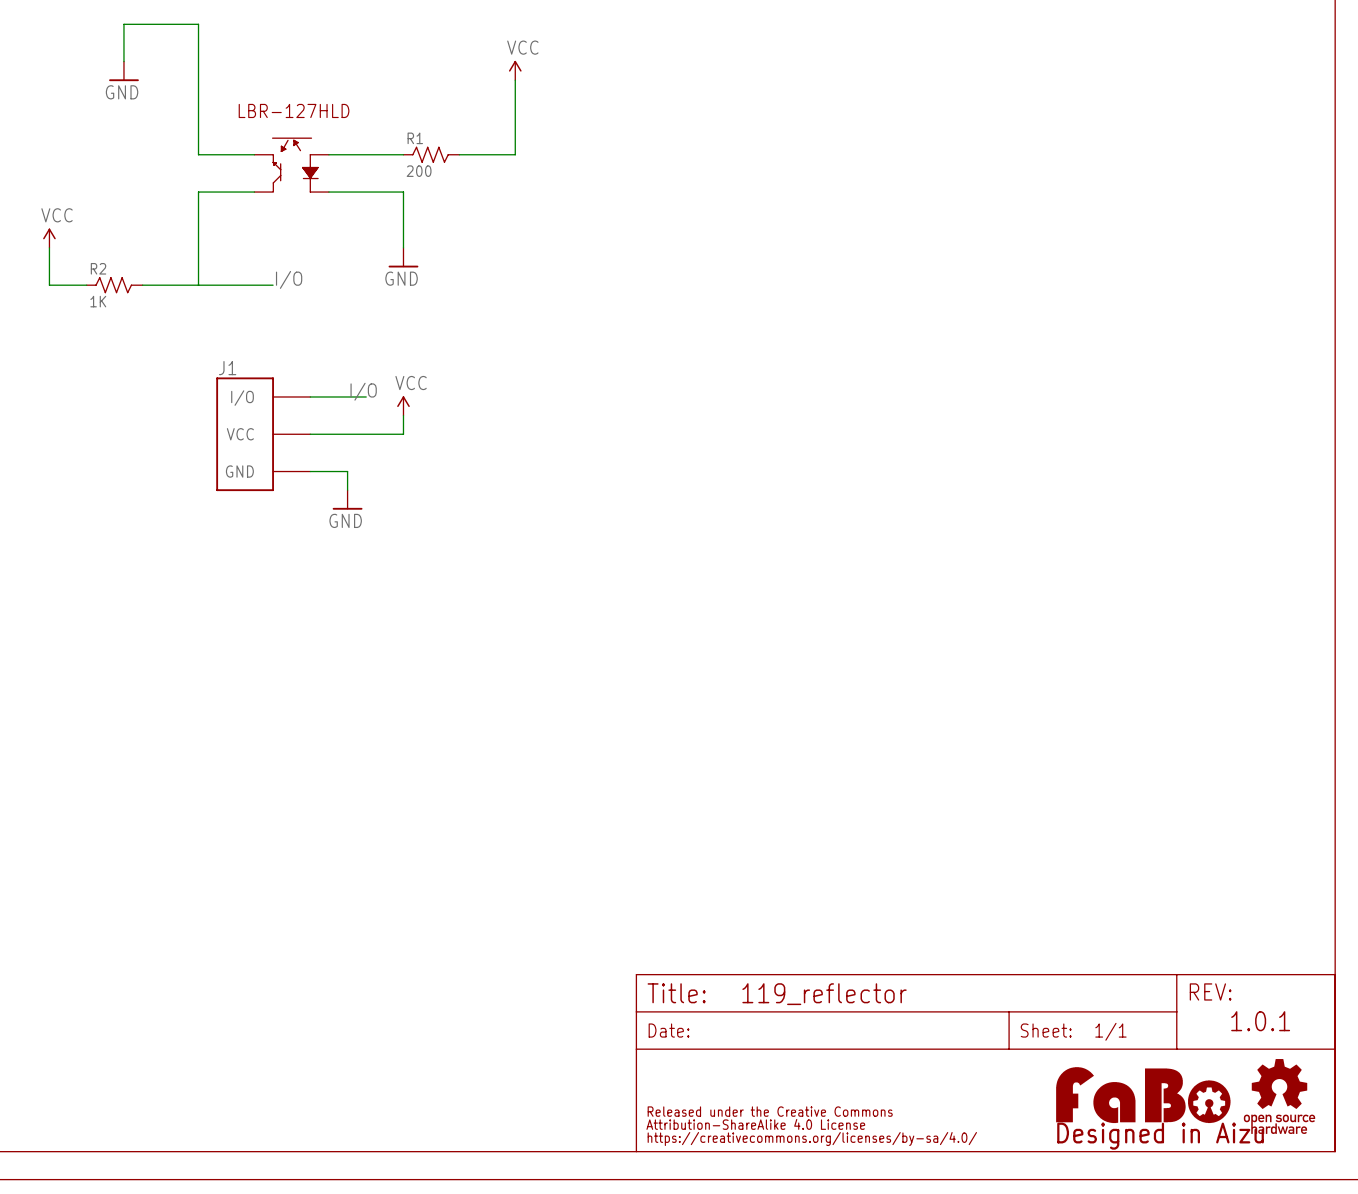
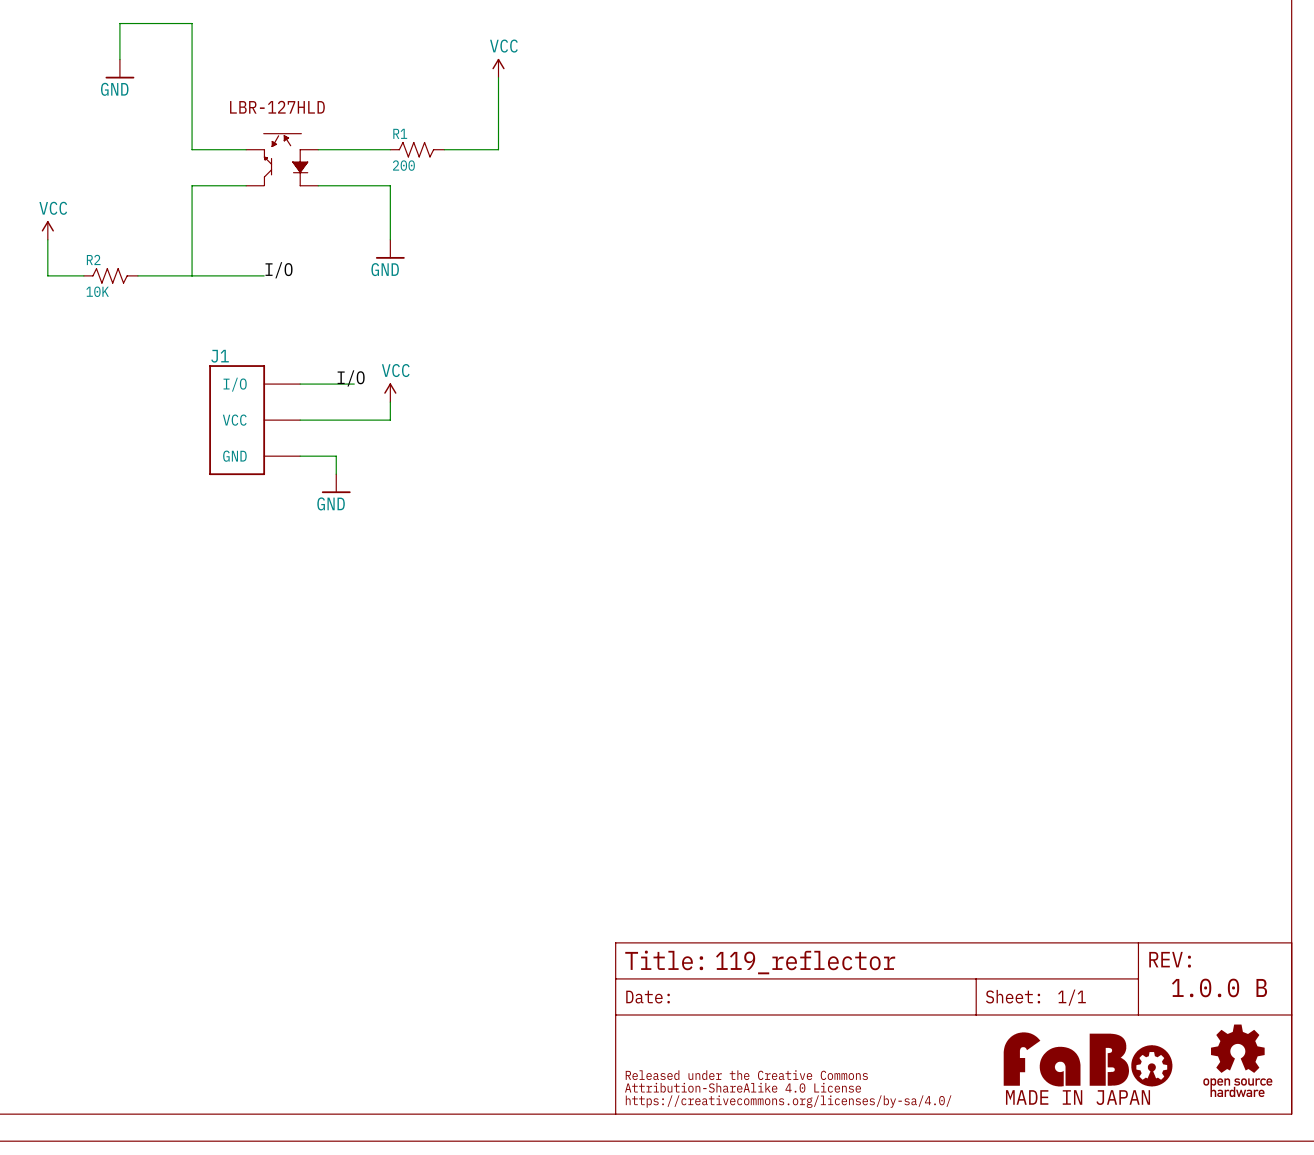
R2 value: 1K (98, 301) -> 10K (97, 291)
text: 1.0.1 (1260, 1021) -> 1.0.0 B (1219, 987)
part: none -> (1088, 1059)
part: (1143, 1095) -> none

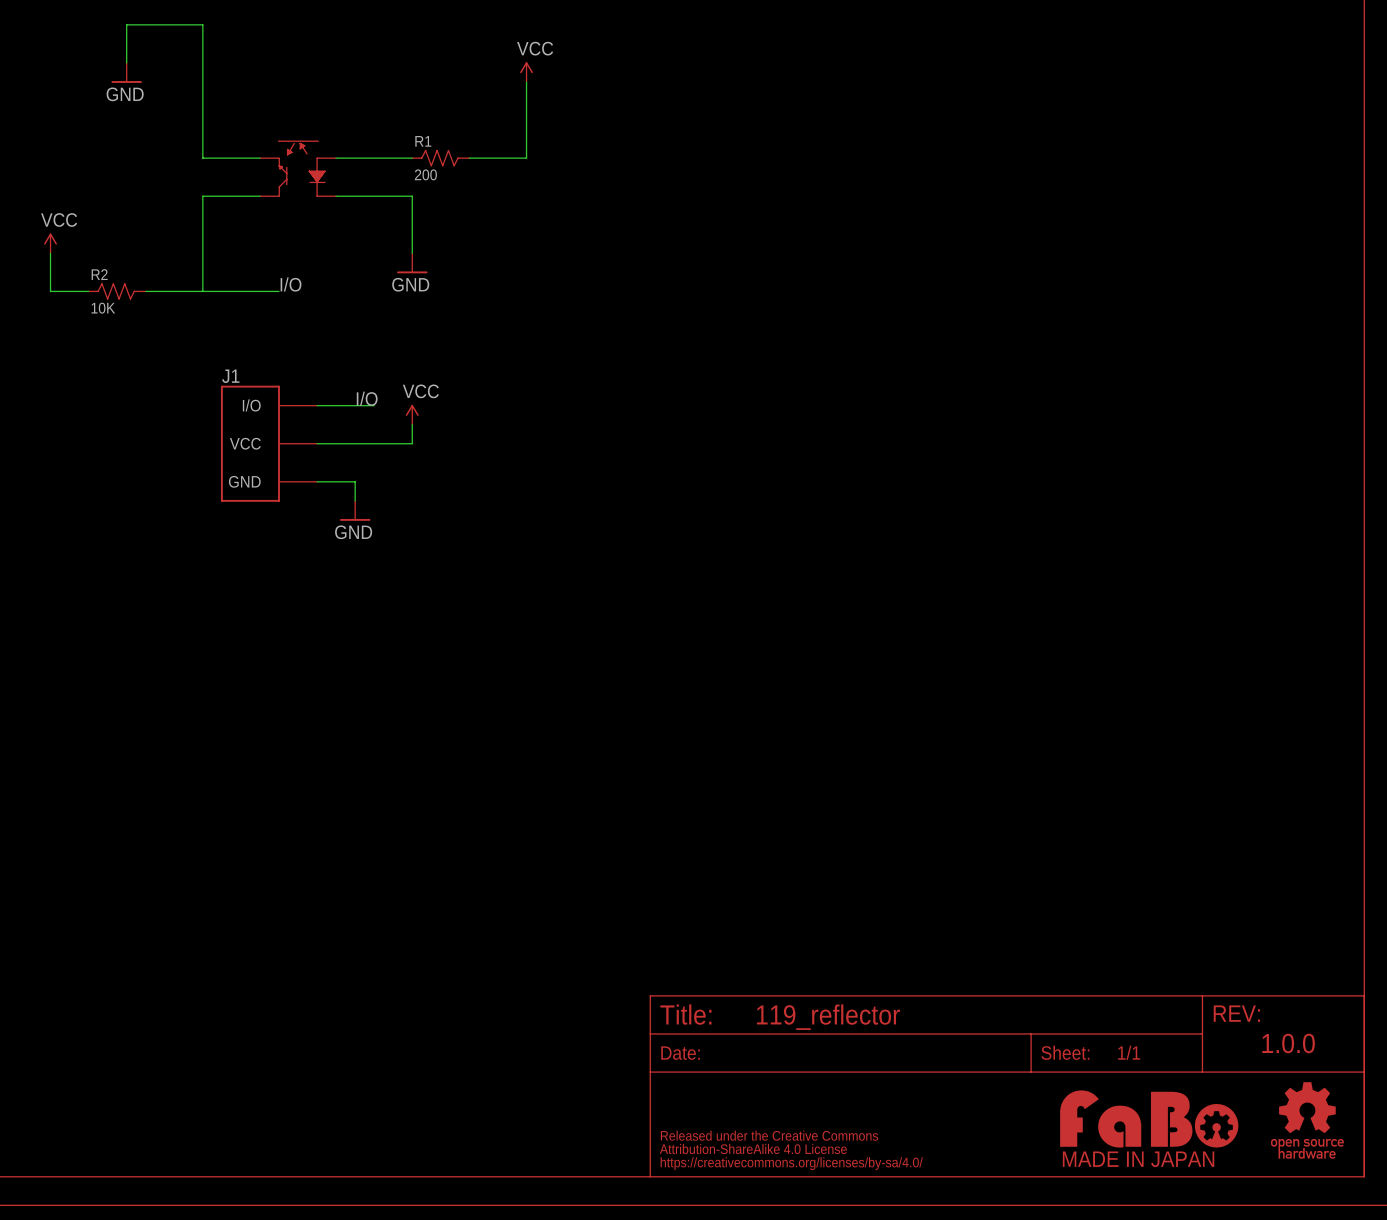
text: LBR-127HLD (277, 107) -> none
text: 1.0.0 B (1219, 987) -> 1.0.0 (1288, 1043)

